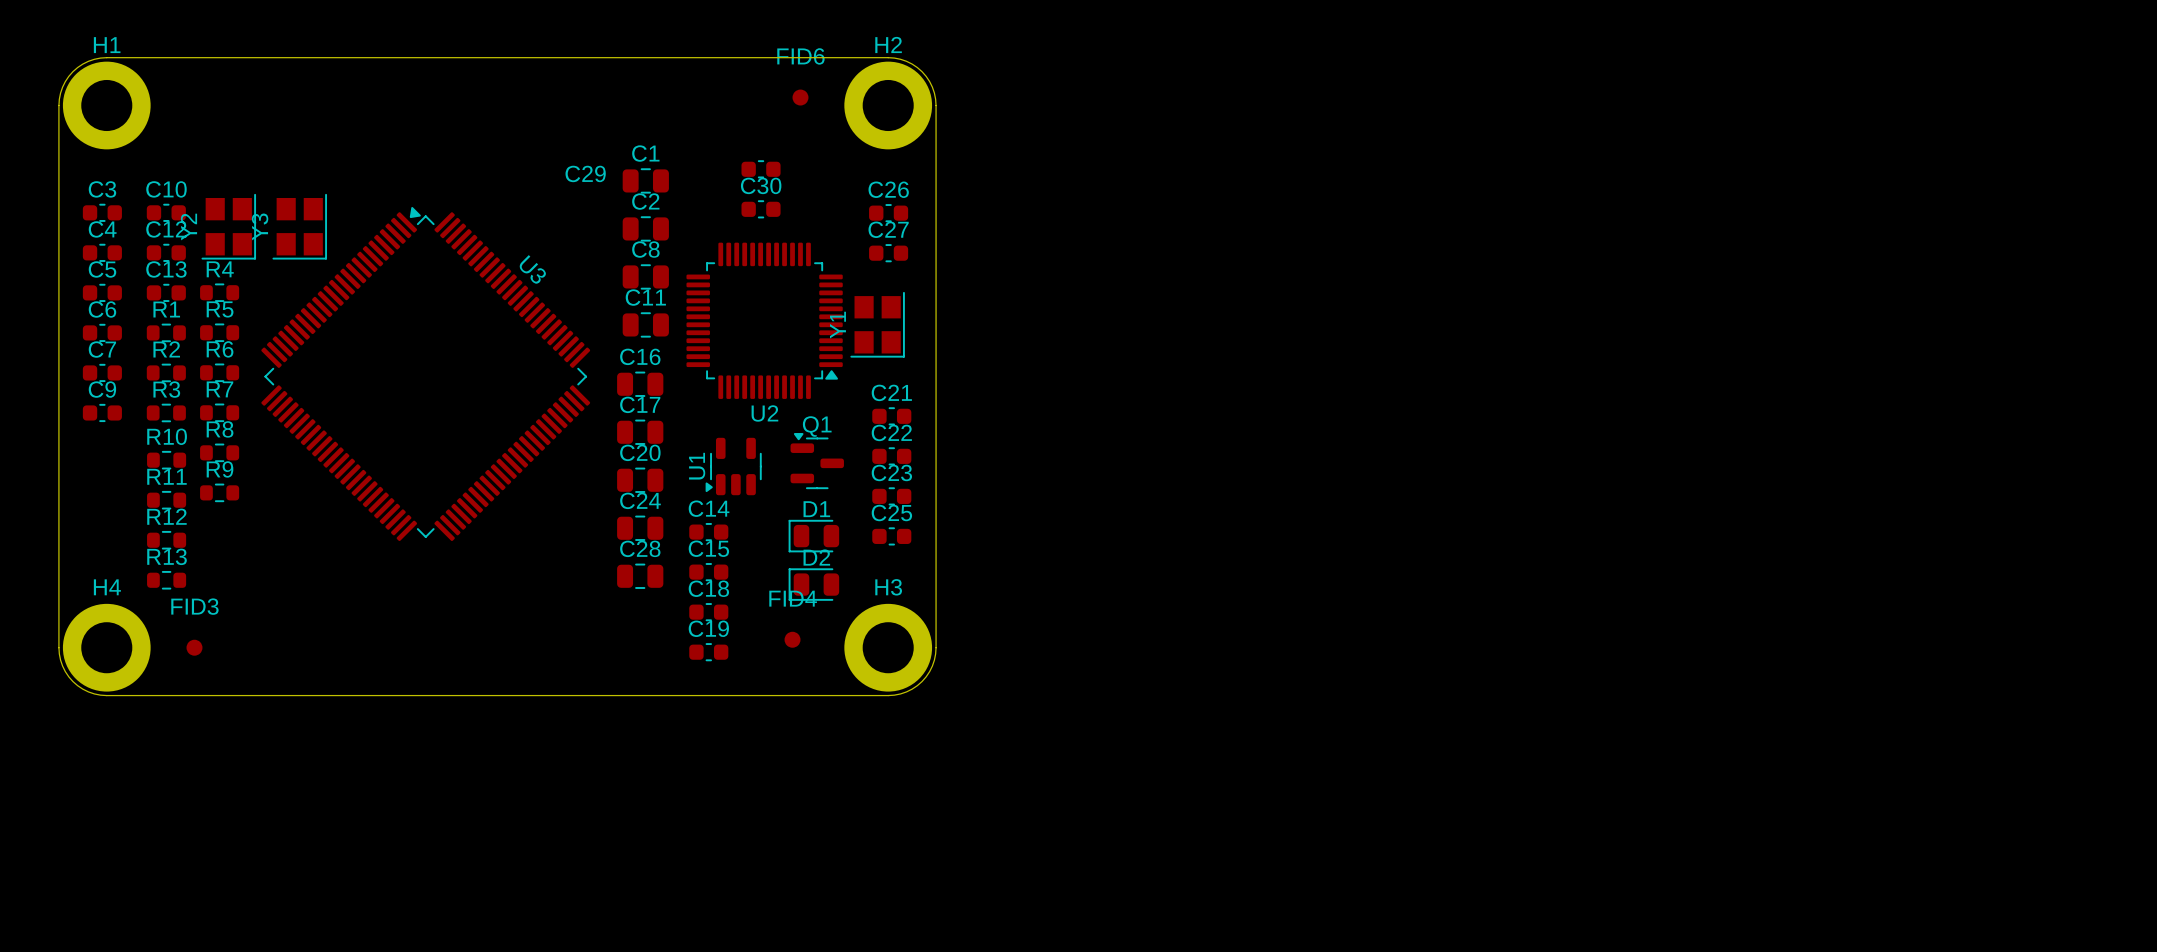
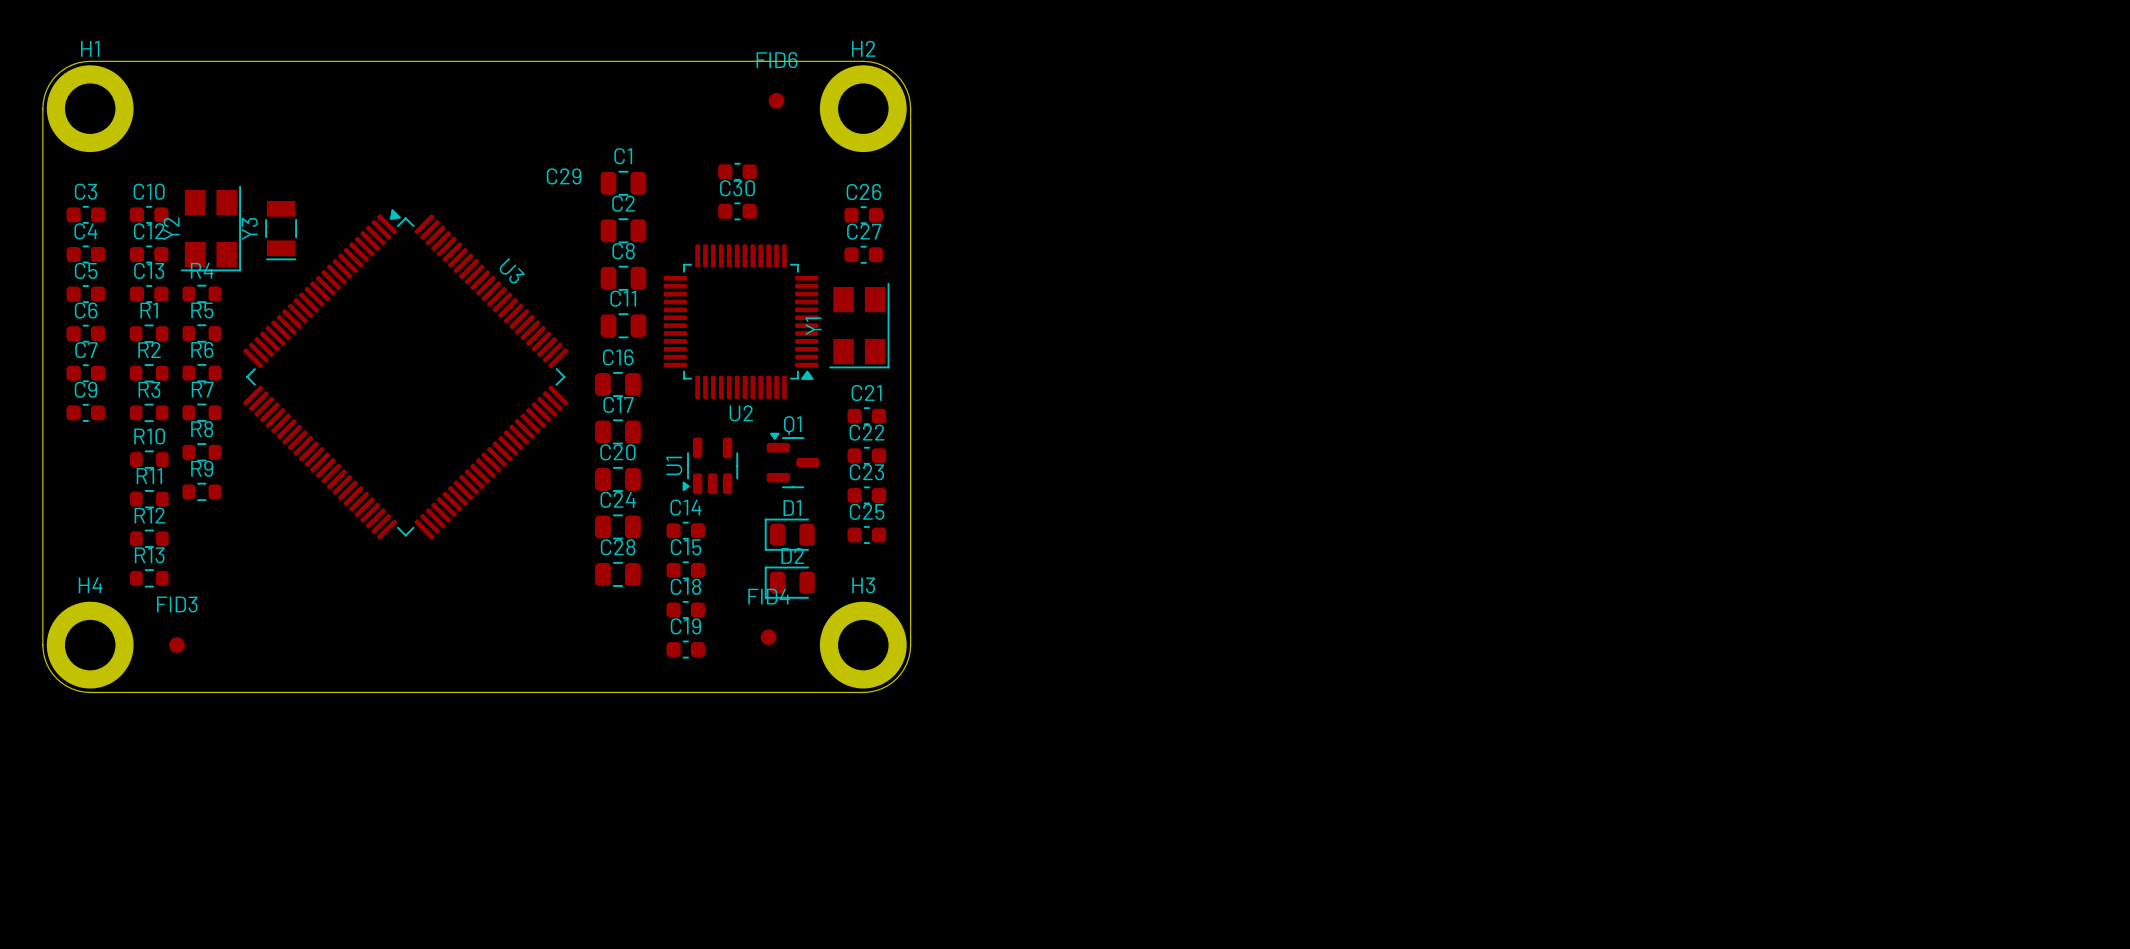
Y2 footprint: [201, 193, 257, 260] -> [180, 185, 242, 272]
Y3 footprint: [272, 193, 328, 260] -> [265, 200, 298, 261]
Y1 footprint: [850, 291, 905, 358] -> [829, 282, 890, 369]

